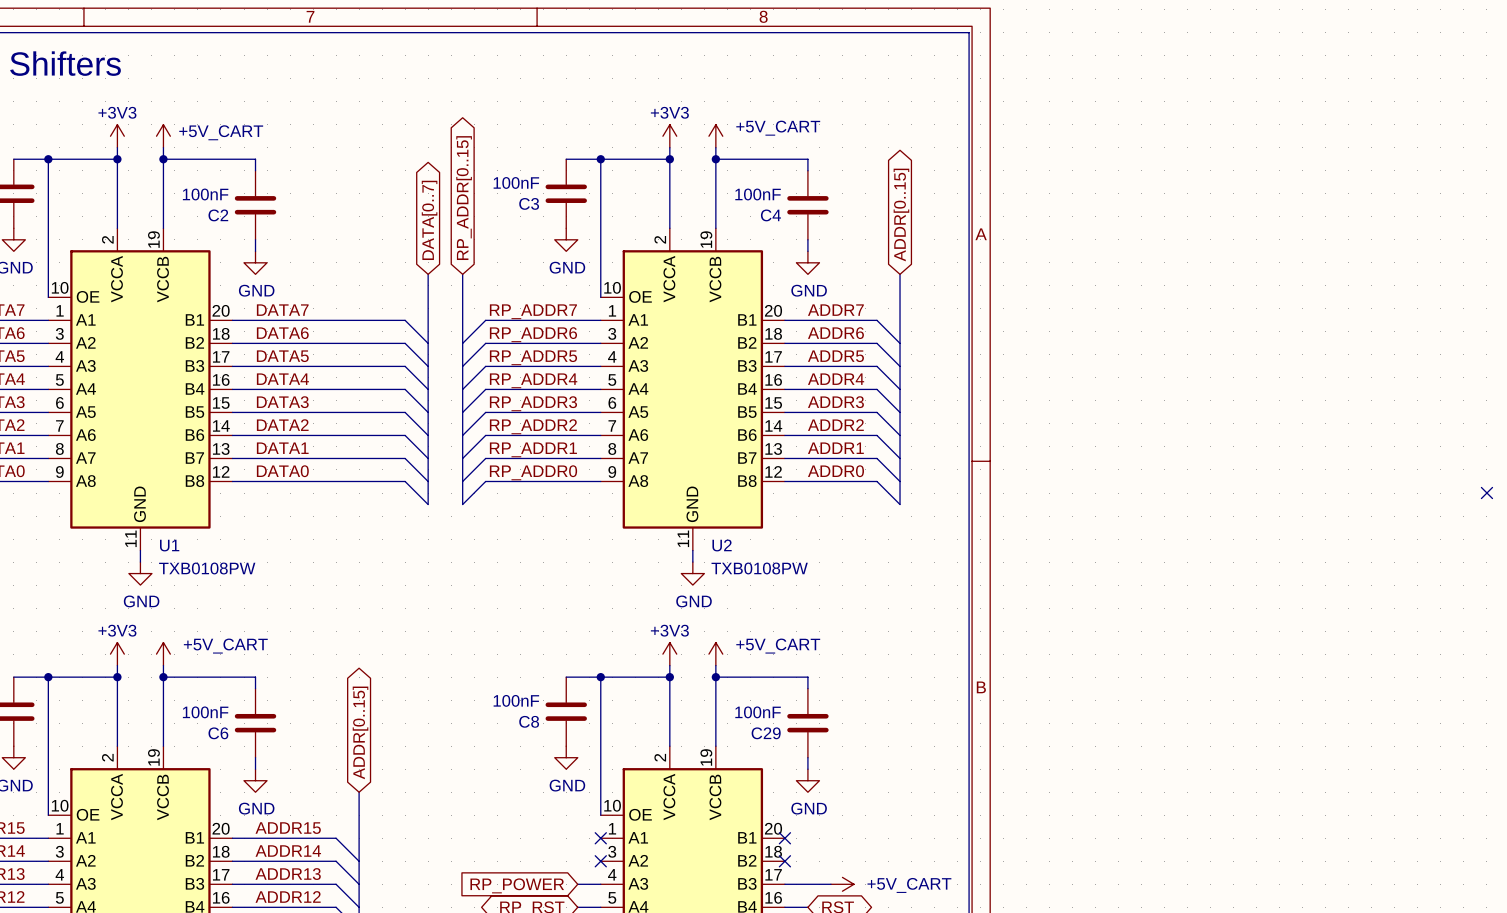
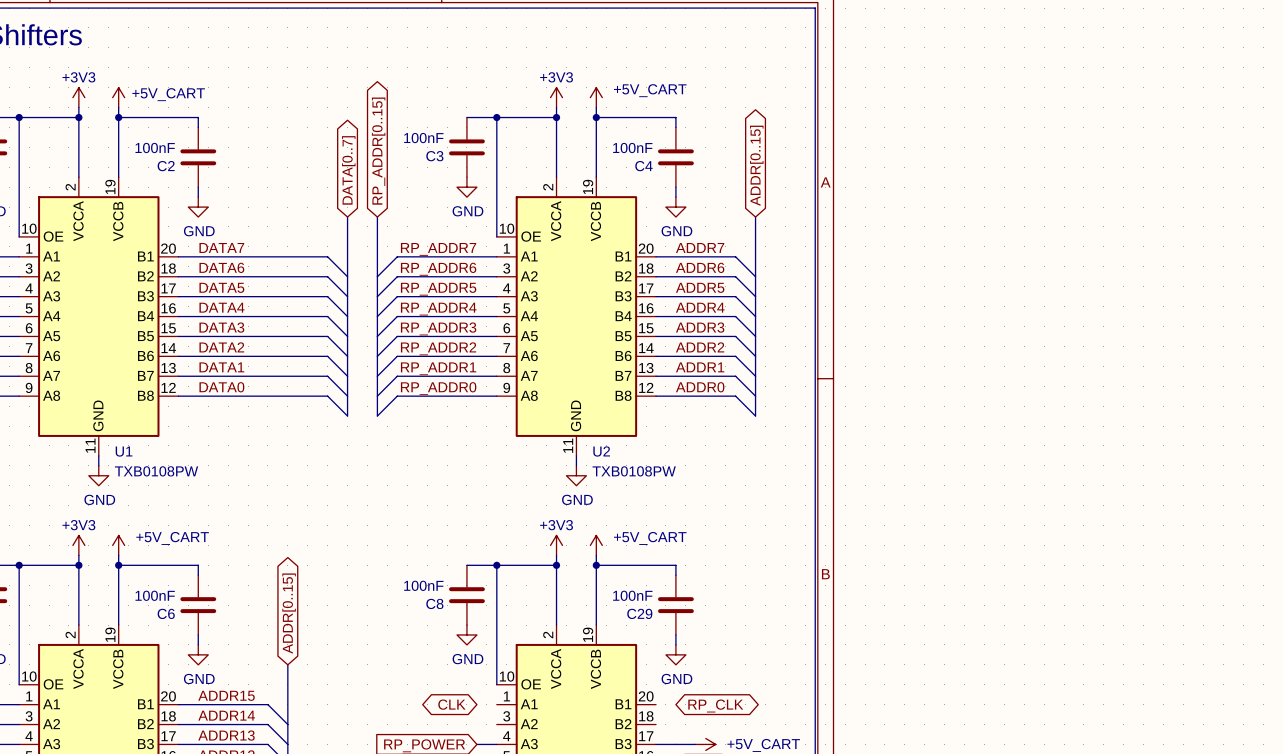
no-connect mark: (1486, 493) -> none
global label: none -> CLK (451, 704)
no-connect mark: (600, 838) -> none
no-connect mark: (784, 838) -> none
global label: none -> RP_CLK (715, 706)
no-connect mark: (600, 861) -> none
no-connect mark: (784, 861) -> none

